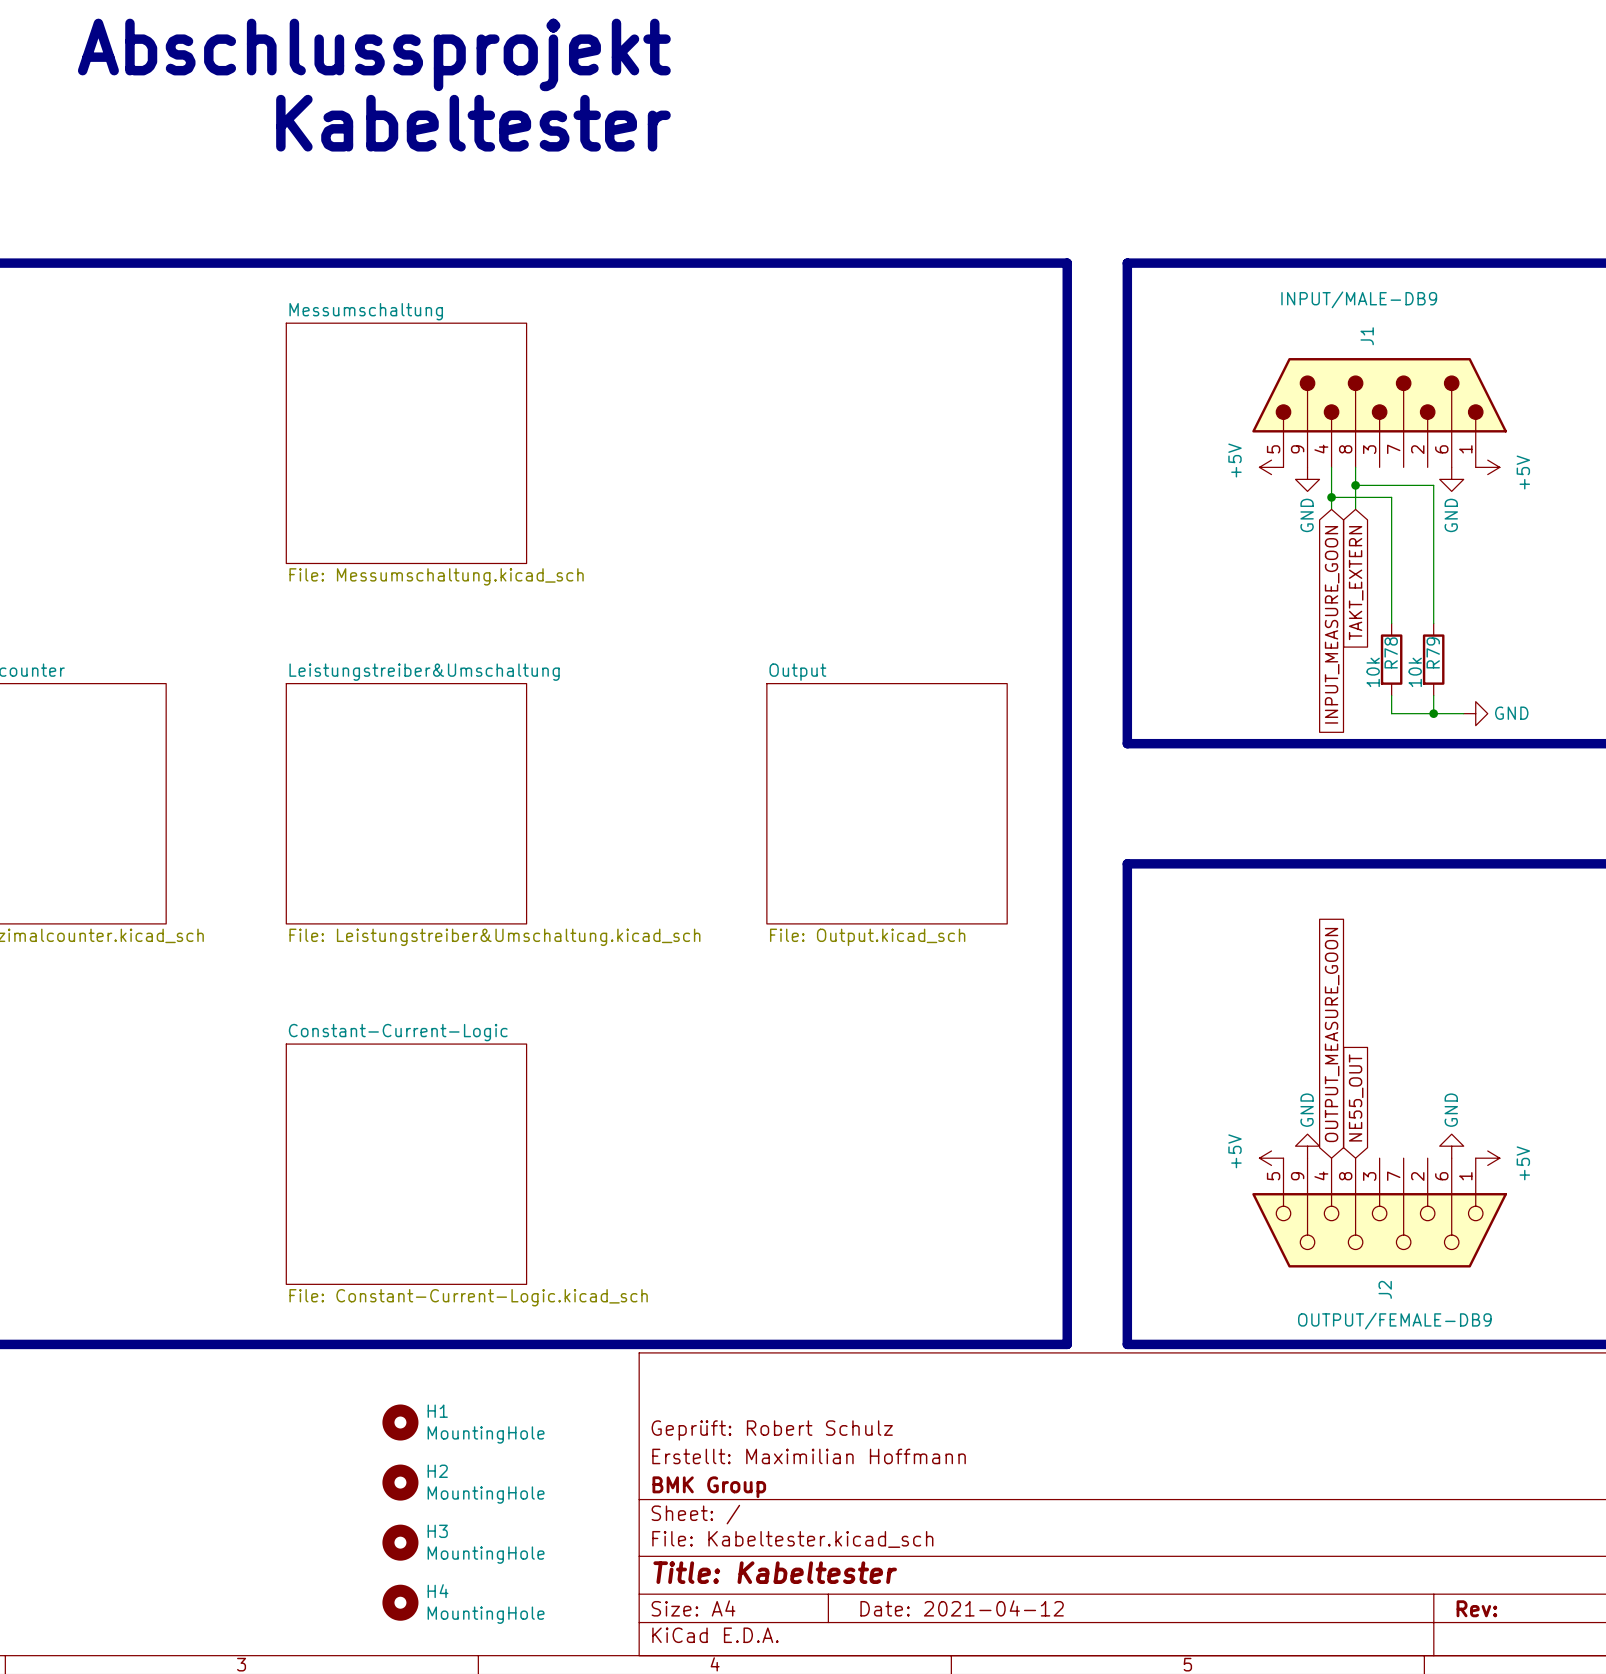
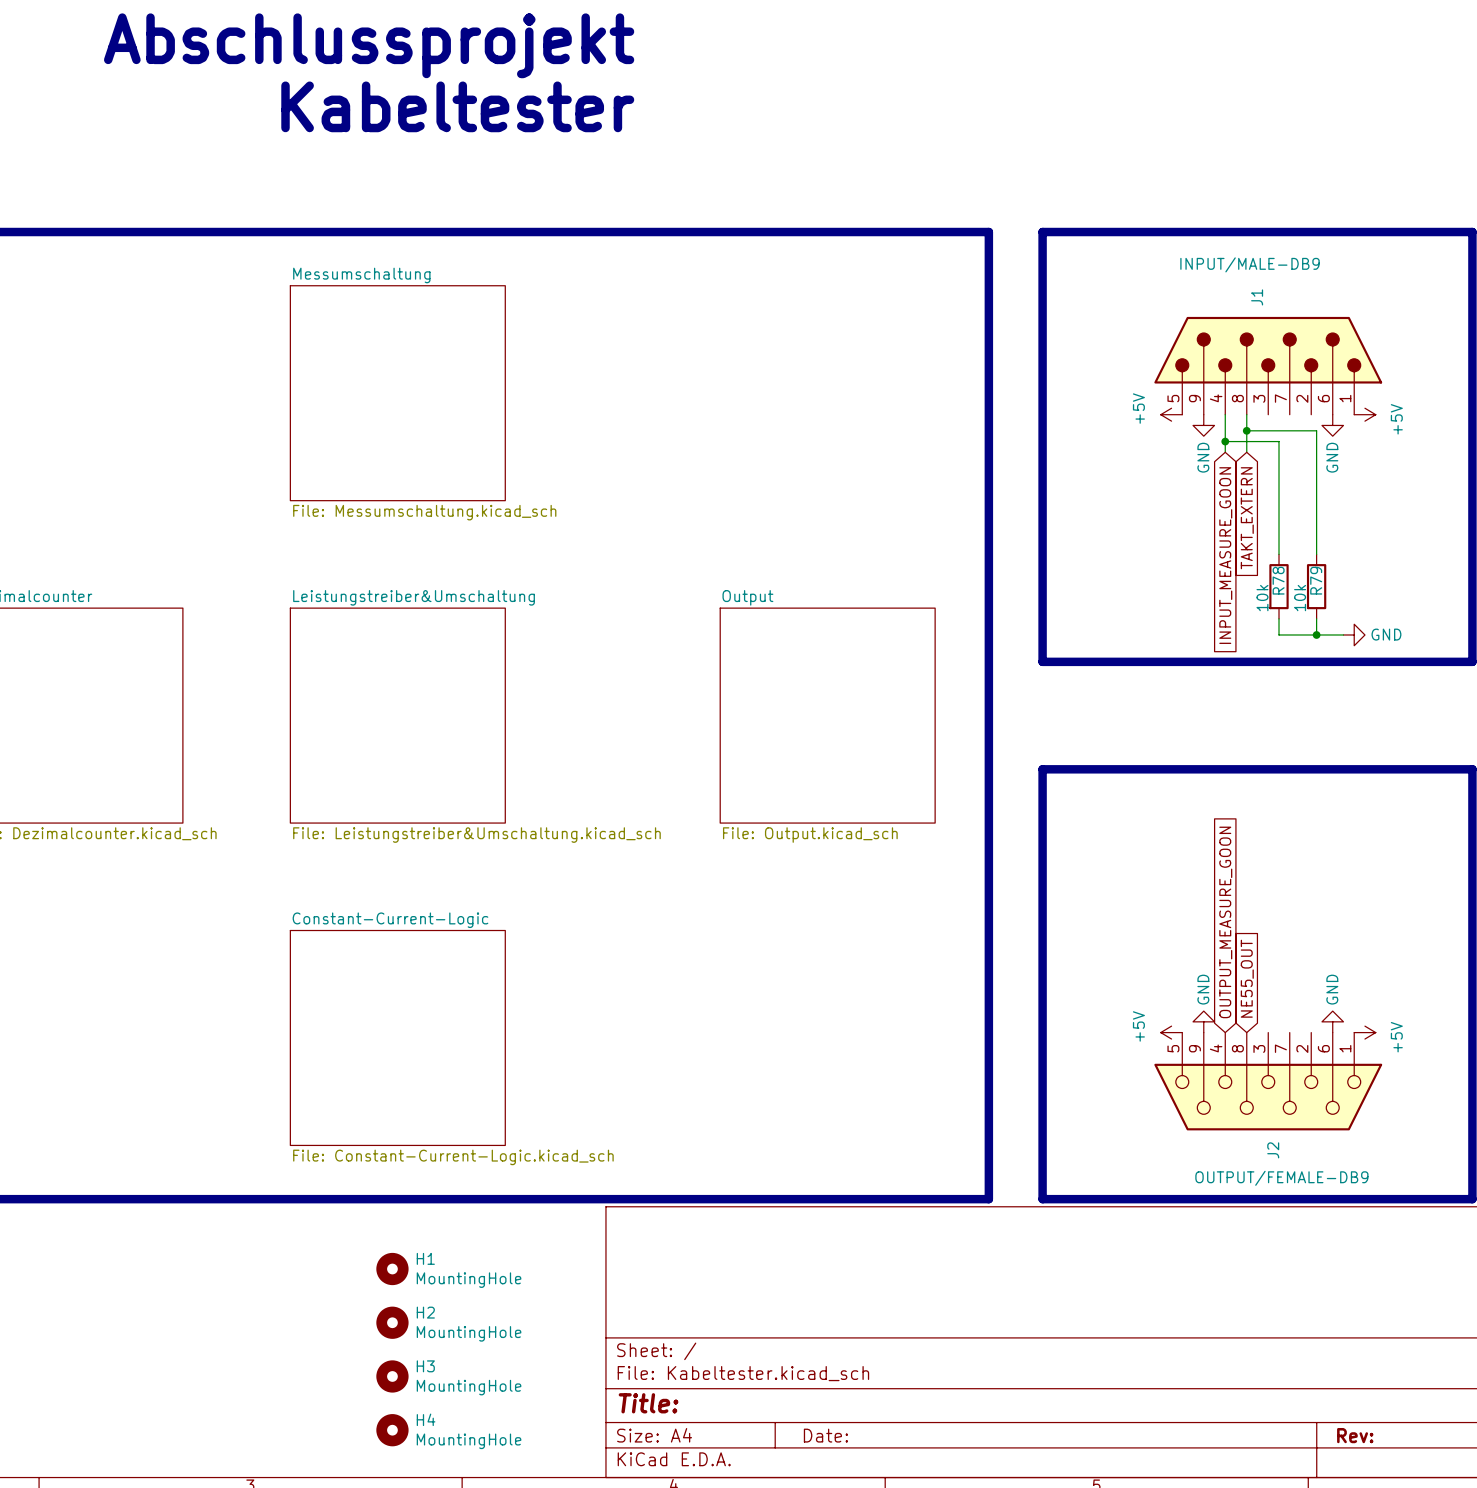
title block: Geprüft: Robert Schulz (772, 1430) -> none
title block: Erstellt: Maximilian Hoffmann (809, 1456) -> none
title block: BMK Group (709, 1487) -> none
title block: Title: Kabeltester (775, 1572) -> Title: (648, 1403)
title block: Date: 2021-04-12 (962, 1608) -> Date: (825, 1435)

